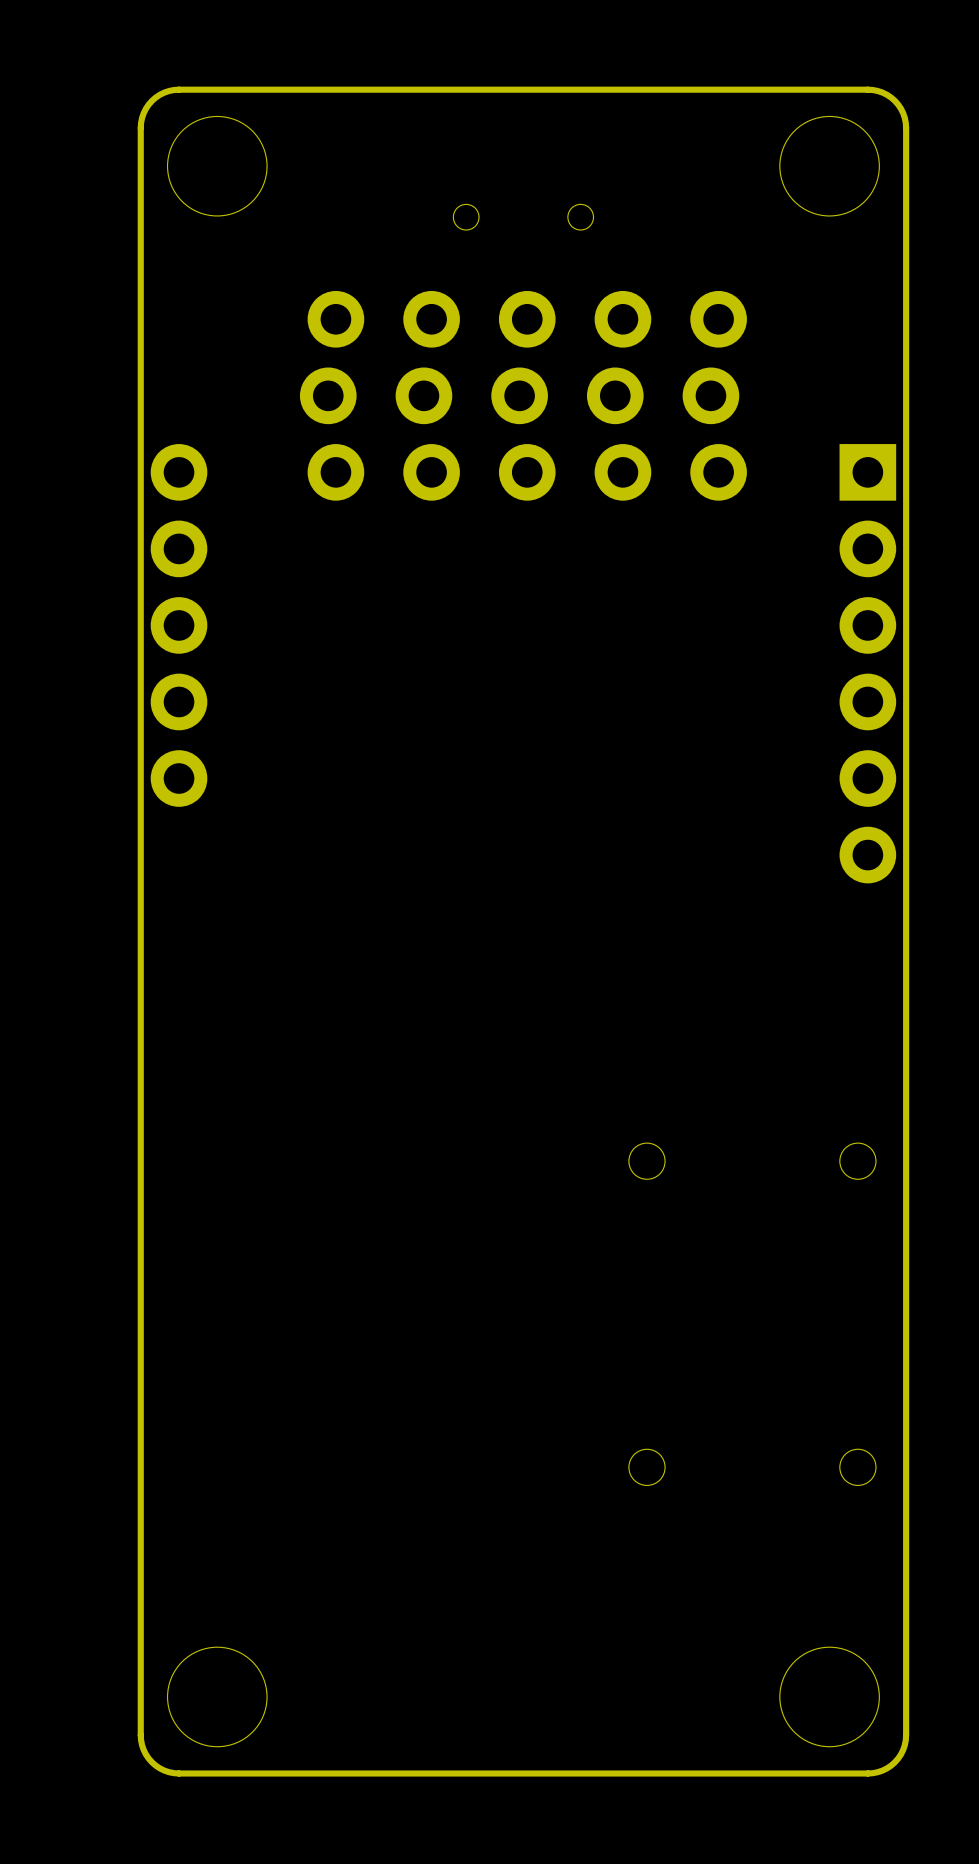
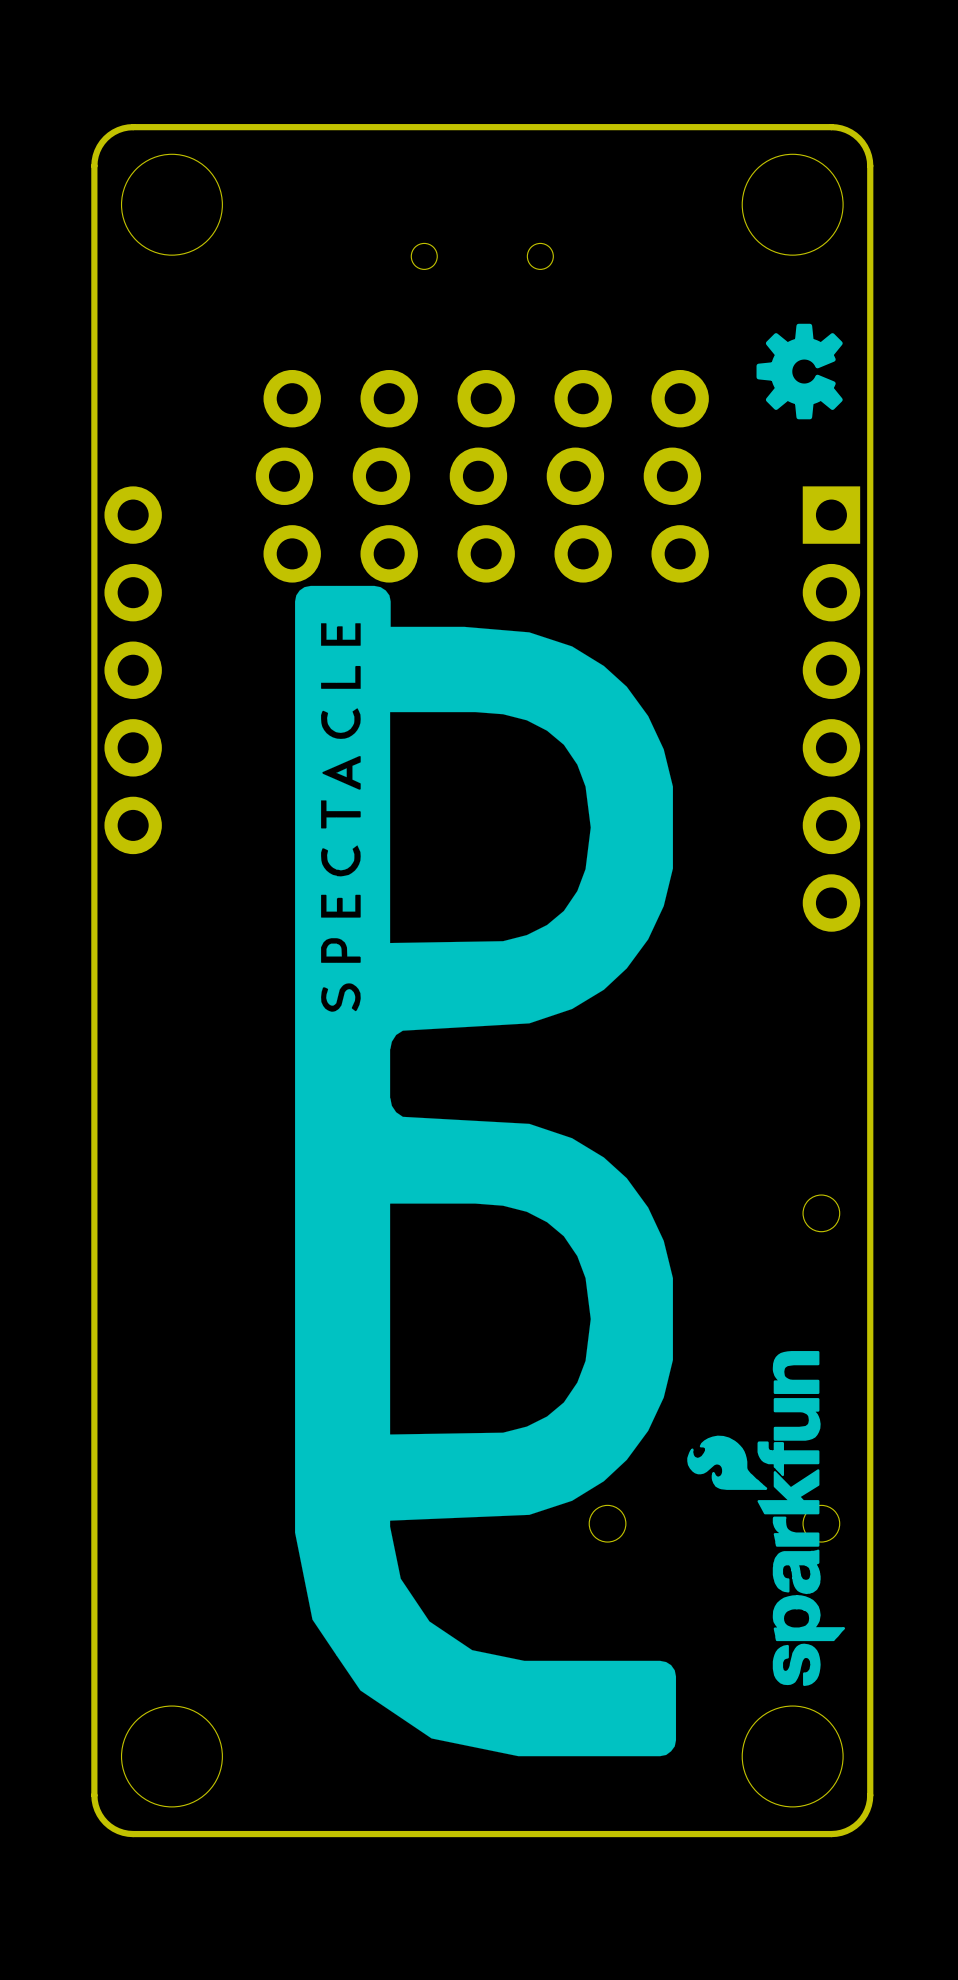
drawing: none -> [756, 323, 843, 420]
part position: (332, 395) -> (288, 476)
part position: (427, 395) -> (385, 476)
part position: (523, 395) -> (482, 476)
part position: (619, 395) -> (579, 476)
part position: (714, 395) -> (676, 476)
drawing: none -> [295, 585, 846, 1757]

